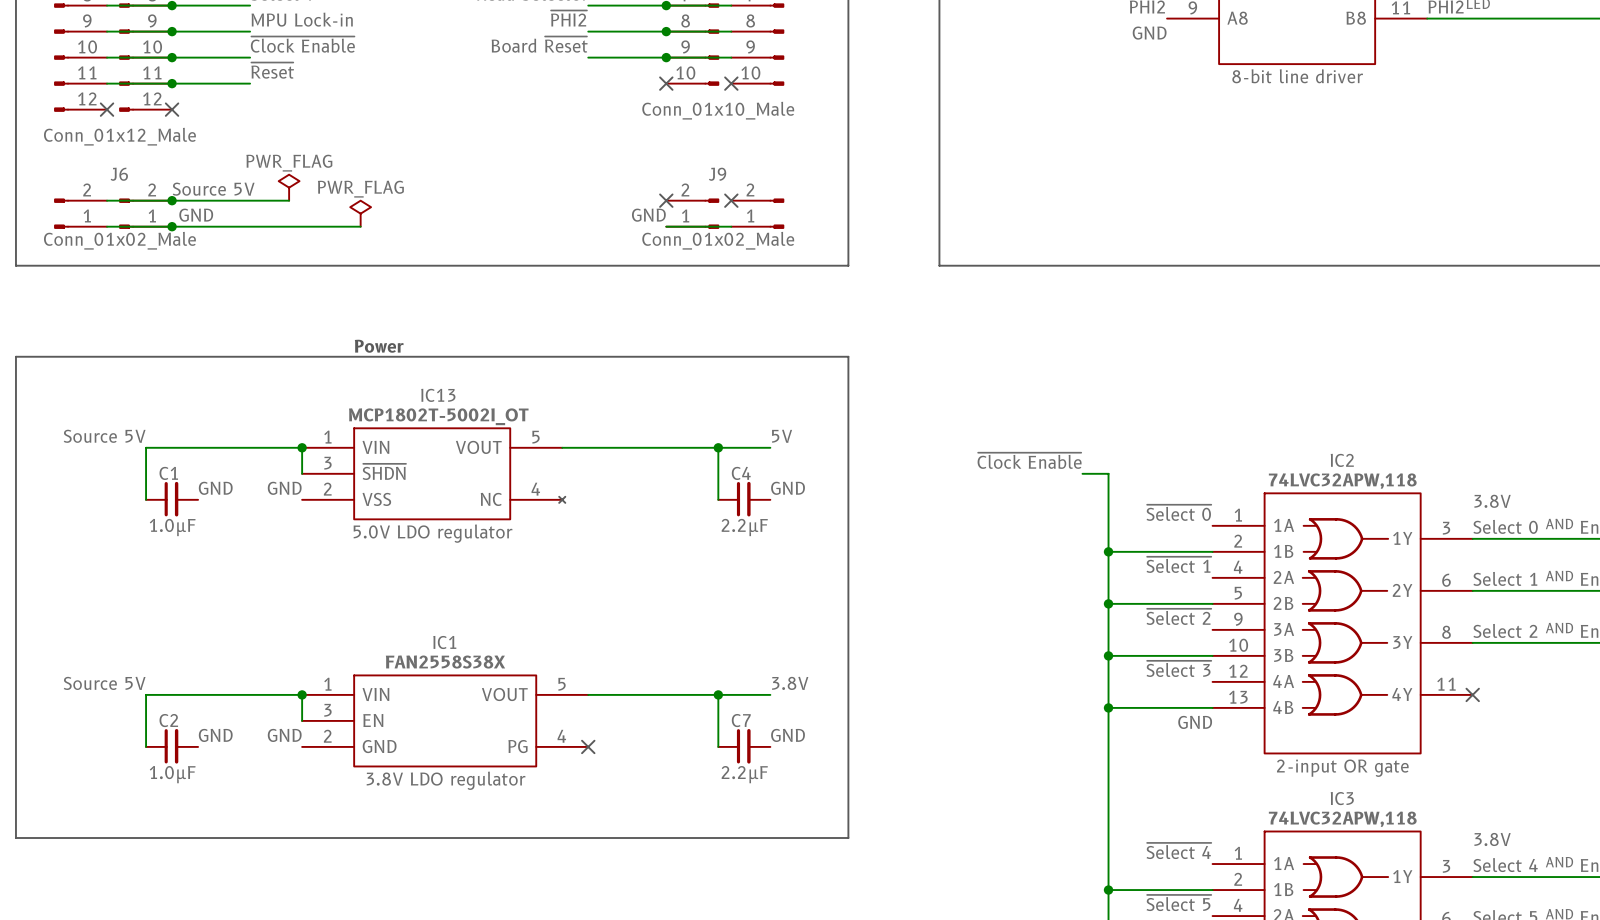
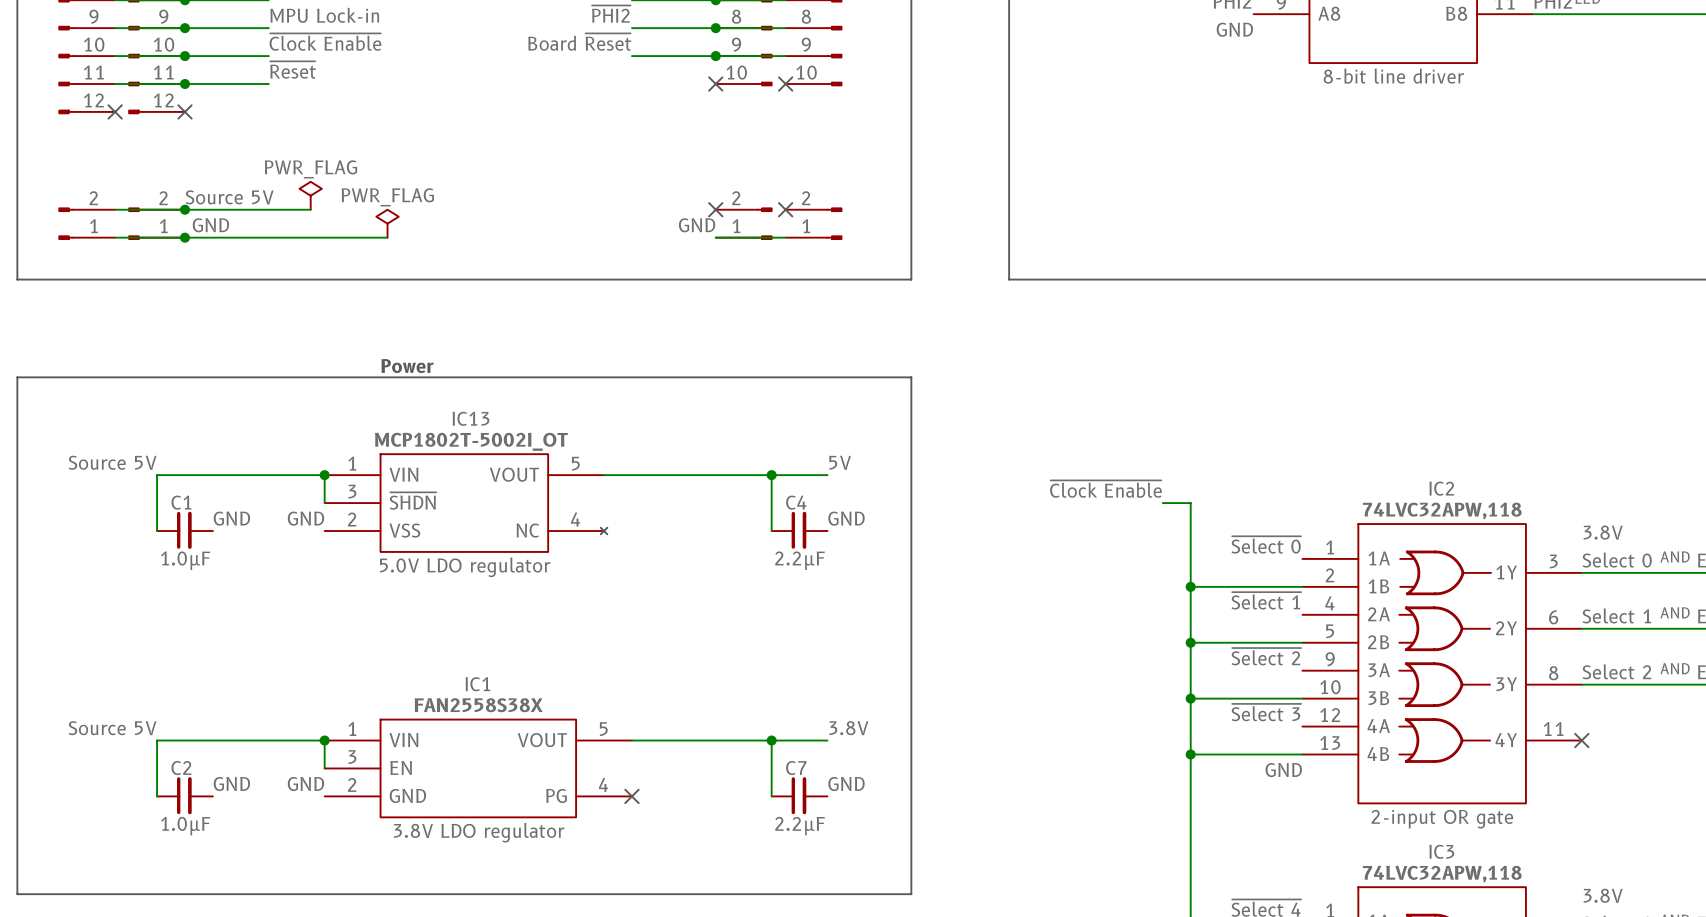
part value: Conn_01x10_Male (718, 110) -> none
part value: Conn_01x12_Male (119, 136) -> none
J6 name: J6 (119, 174) -> none
J9 name: J9 (717, 174) -> none
J6 value: Conn_01x02_Male (119, 240) -> none
J9 value: Conn_01x02_Male (718, 240) -> none

